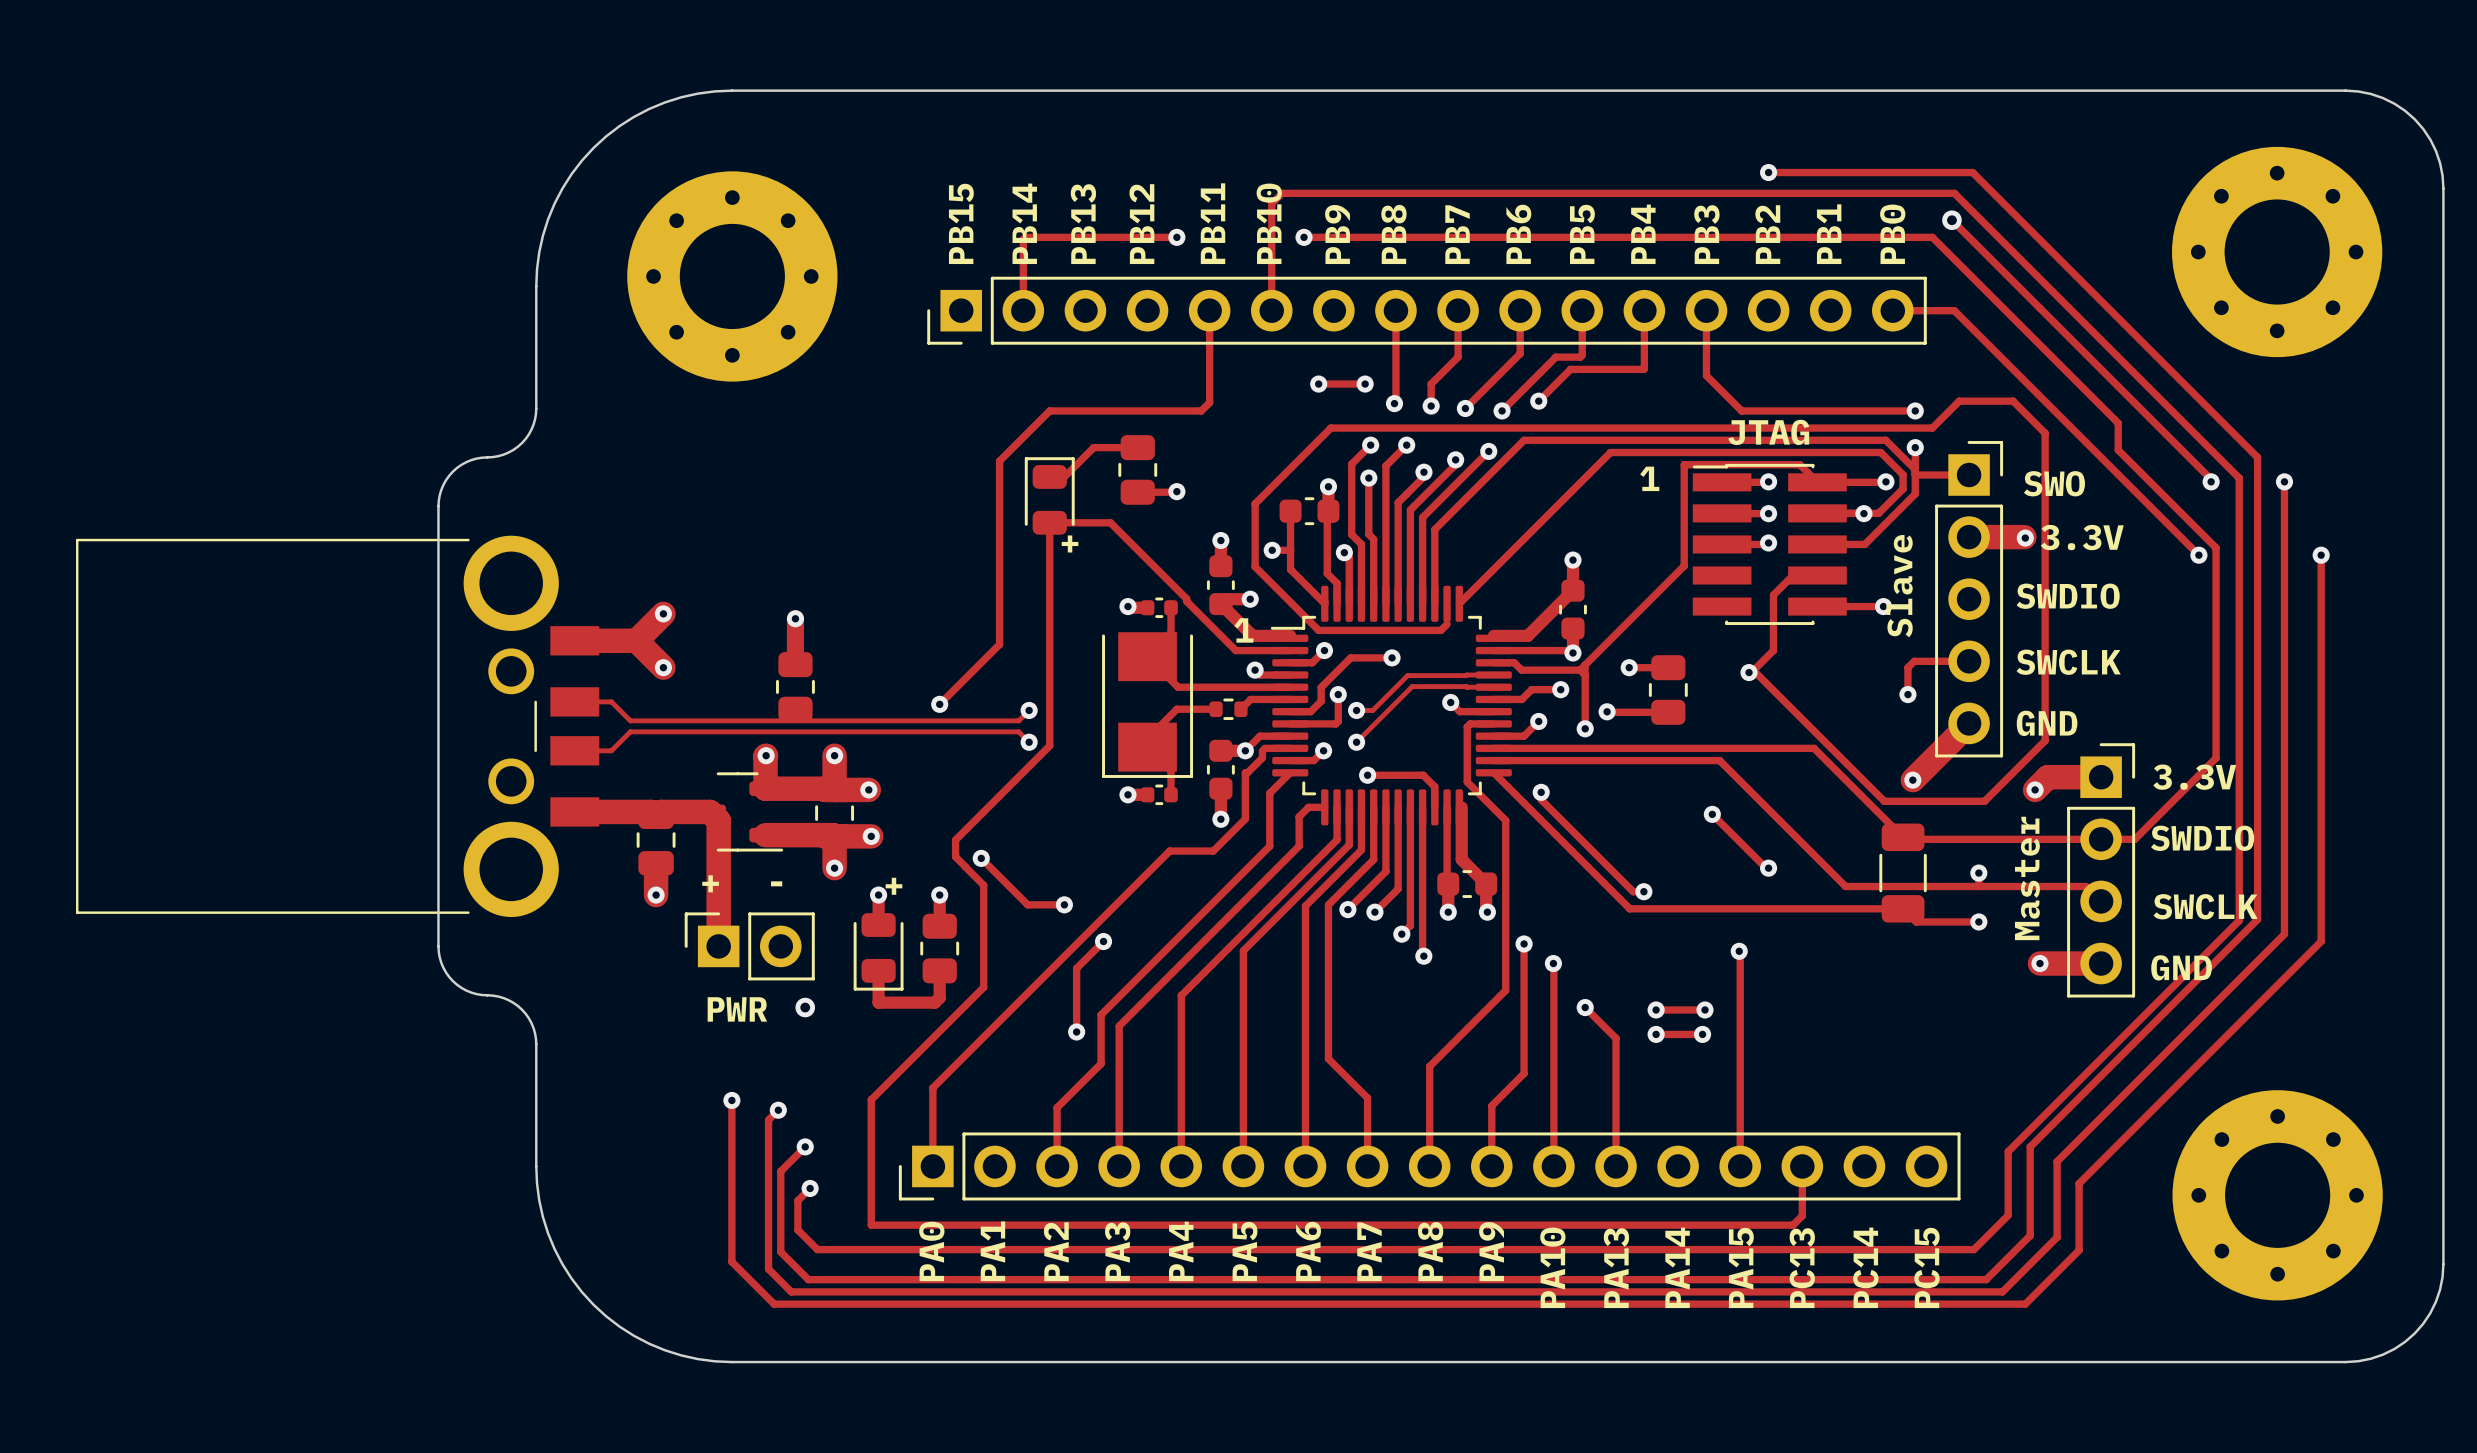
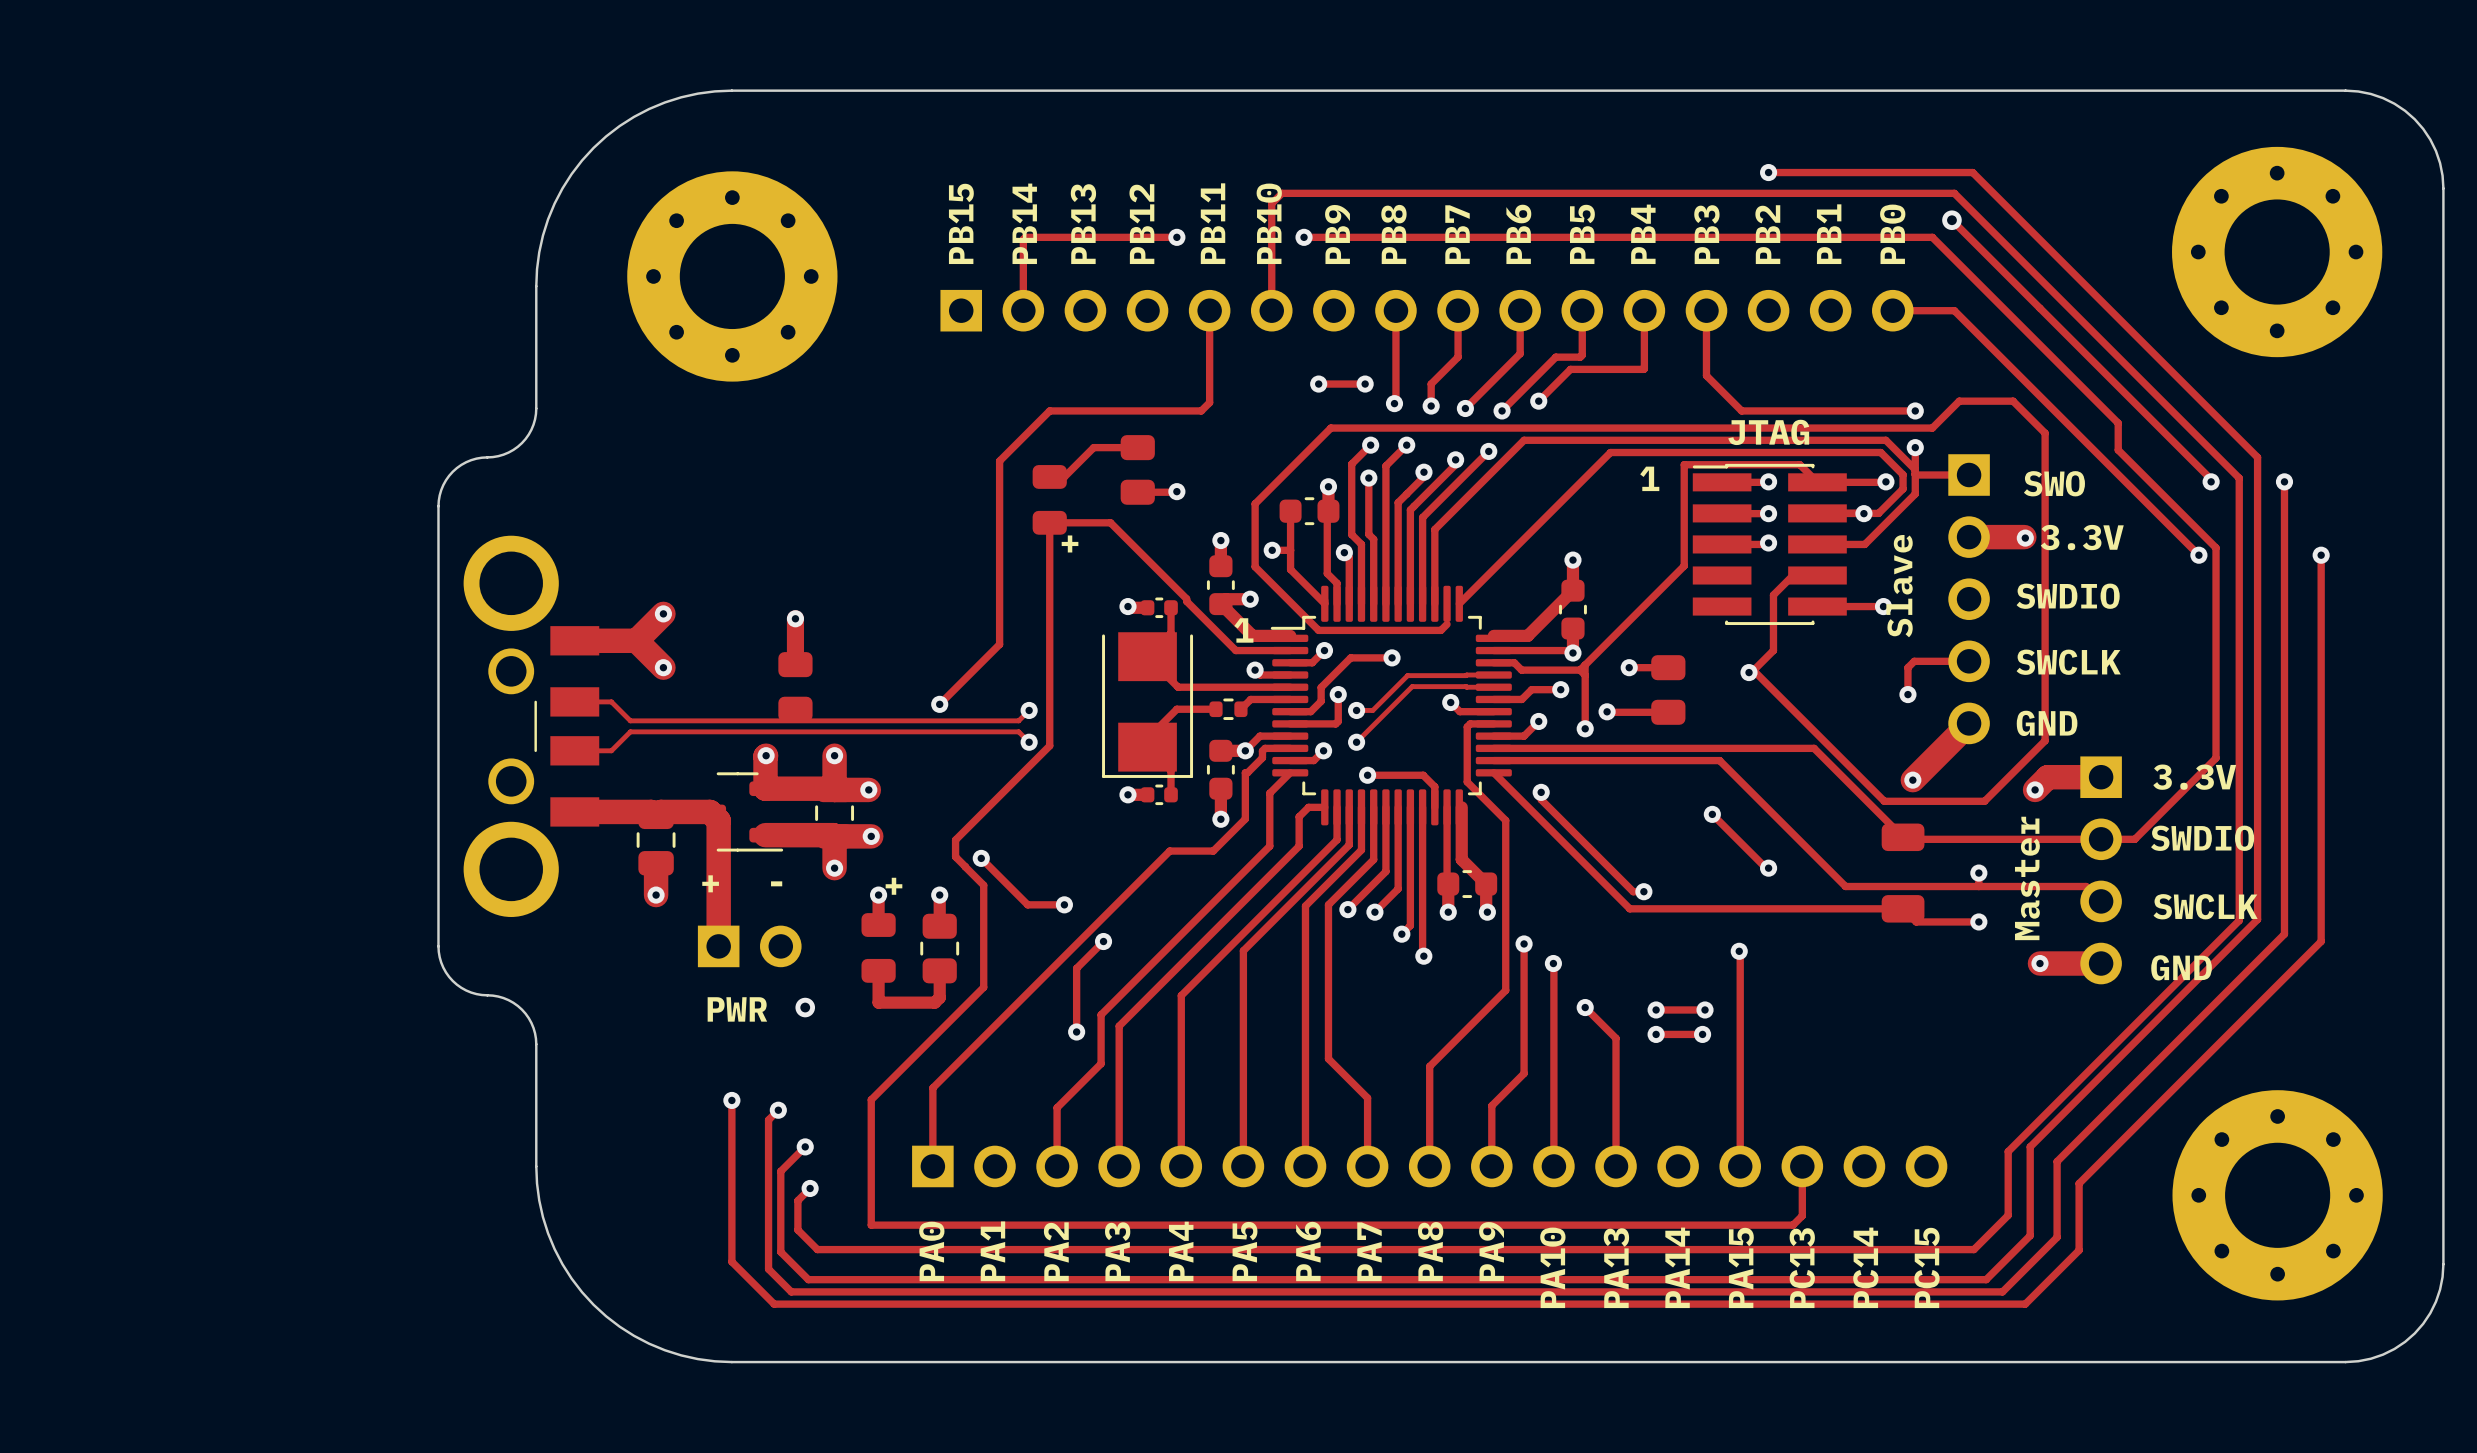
part footprint: [927, 276, 1927, 345] -> [940, 289, 1914, 332]
part footprint: [1118, 435, 1158, 505] -> [1120, 435, 1155, 505]
part footprint: [1935, 441, 2004, 758] -> [1948, 454, 1990, 745]
part footprint: [1024, 457, 1075, 535] -> [1032, 465, 1067, 535]
part footprint: [776, 652, 815, 722] -> [778, 652, 813, 722]
part footprint: [1648, 655, 1688, 725] -> [1651, 655, 1686, 725]
part: (337, 726) -> none
part footprint: [2067, 743, 2136, 998] -> [2080, 756, 2122, 985]
part footprint: [1879, 823, 1927, 923] -> [1881, 823, 1925, 923]
part footprint: [684, 912, 815, 981] -> [697, 925, 802, 968]
part footprint: [853, 913, 904, 991] -> [861, 913, 896, 983]
part footprint: [898, 1132, 1961, 1201] -> [912, 1145, 1948, 1188]

